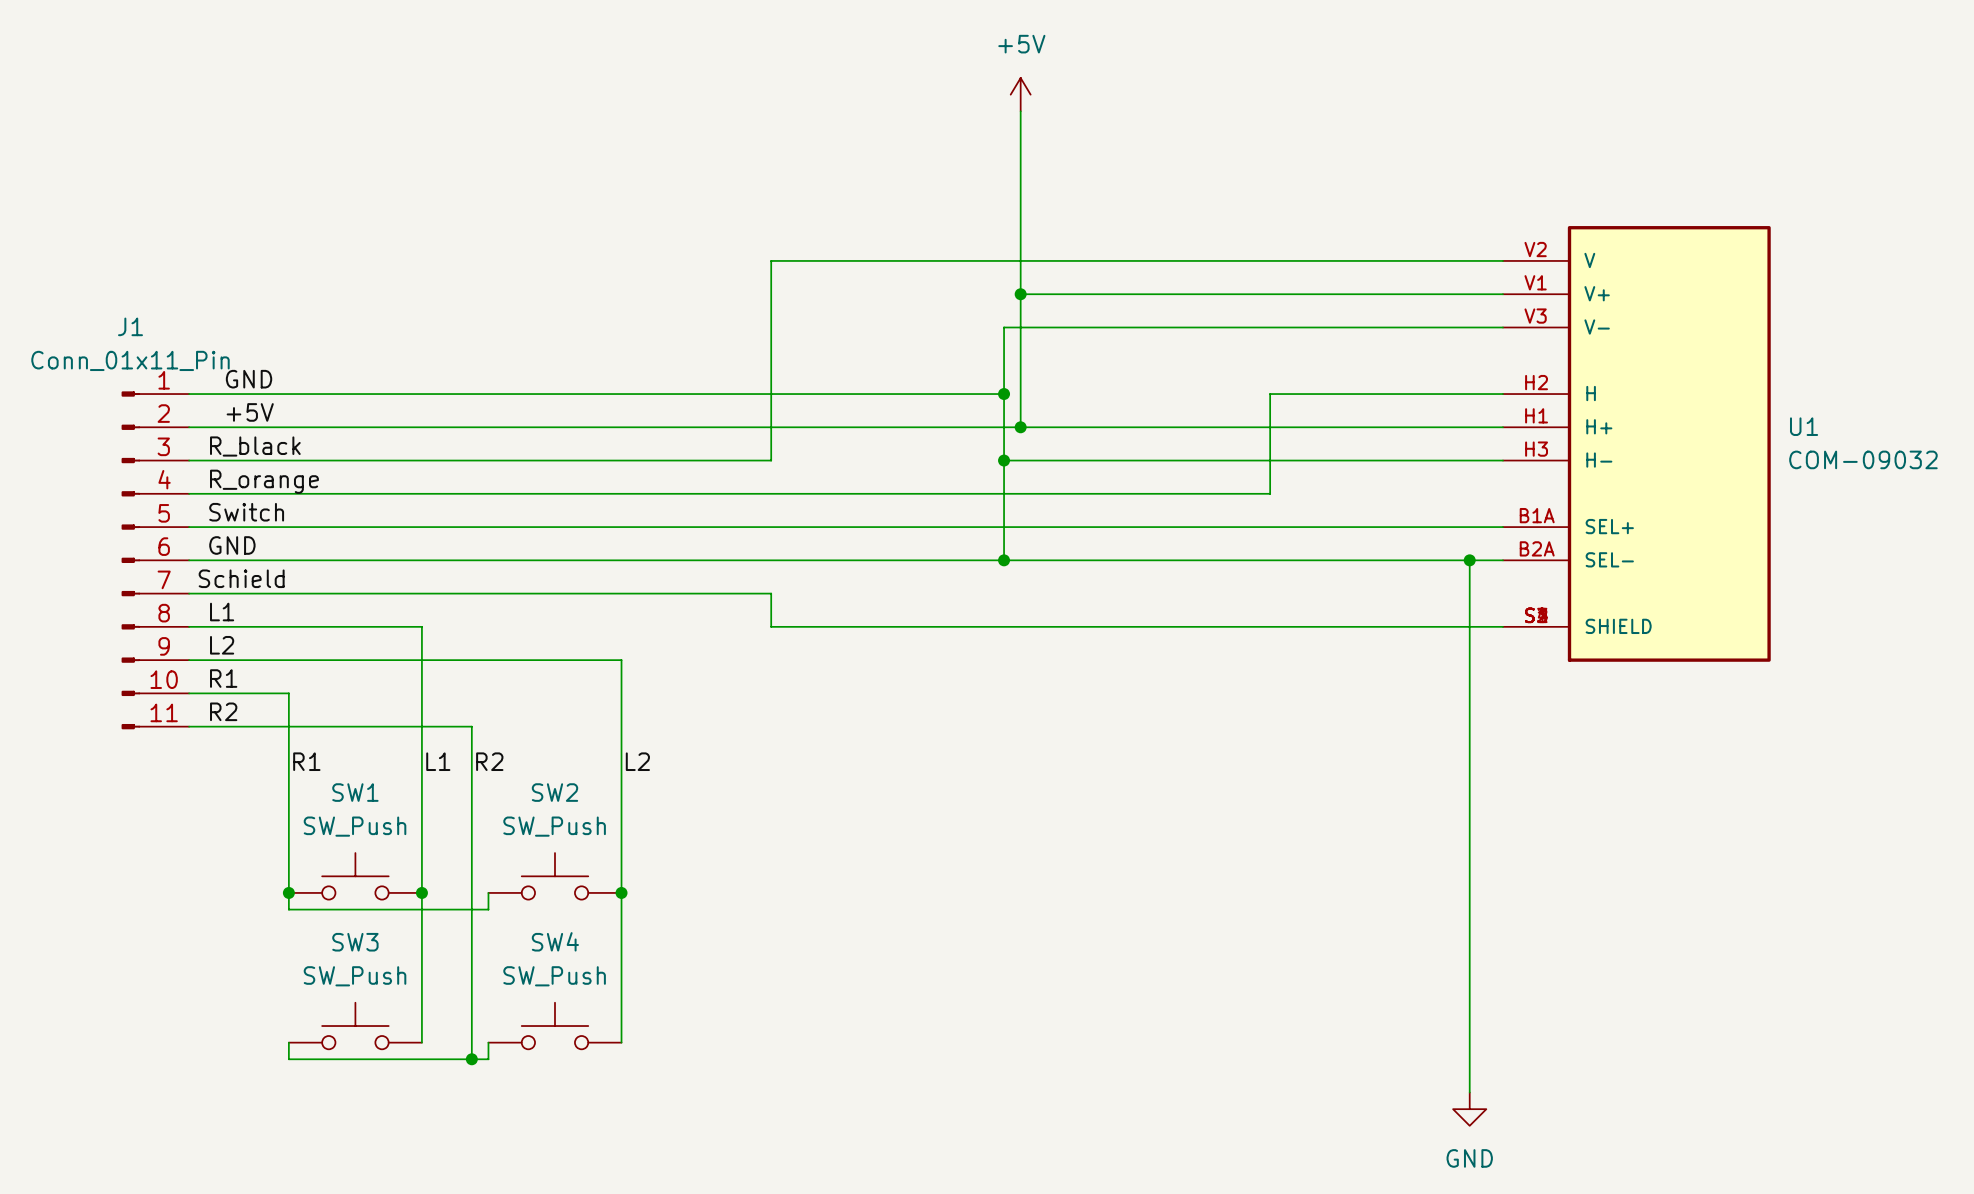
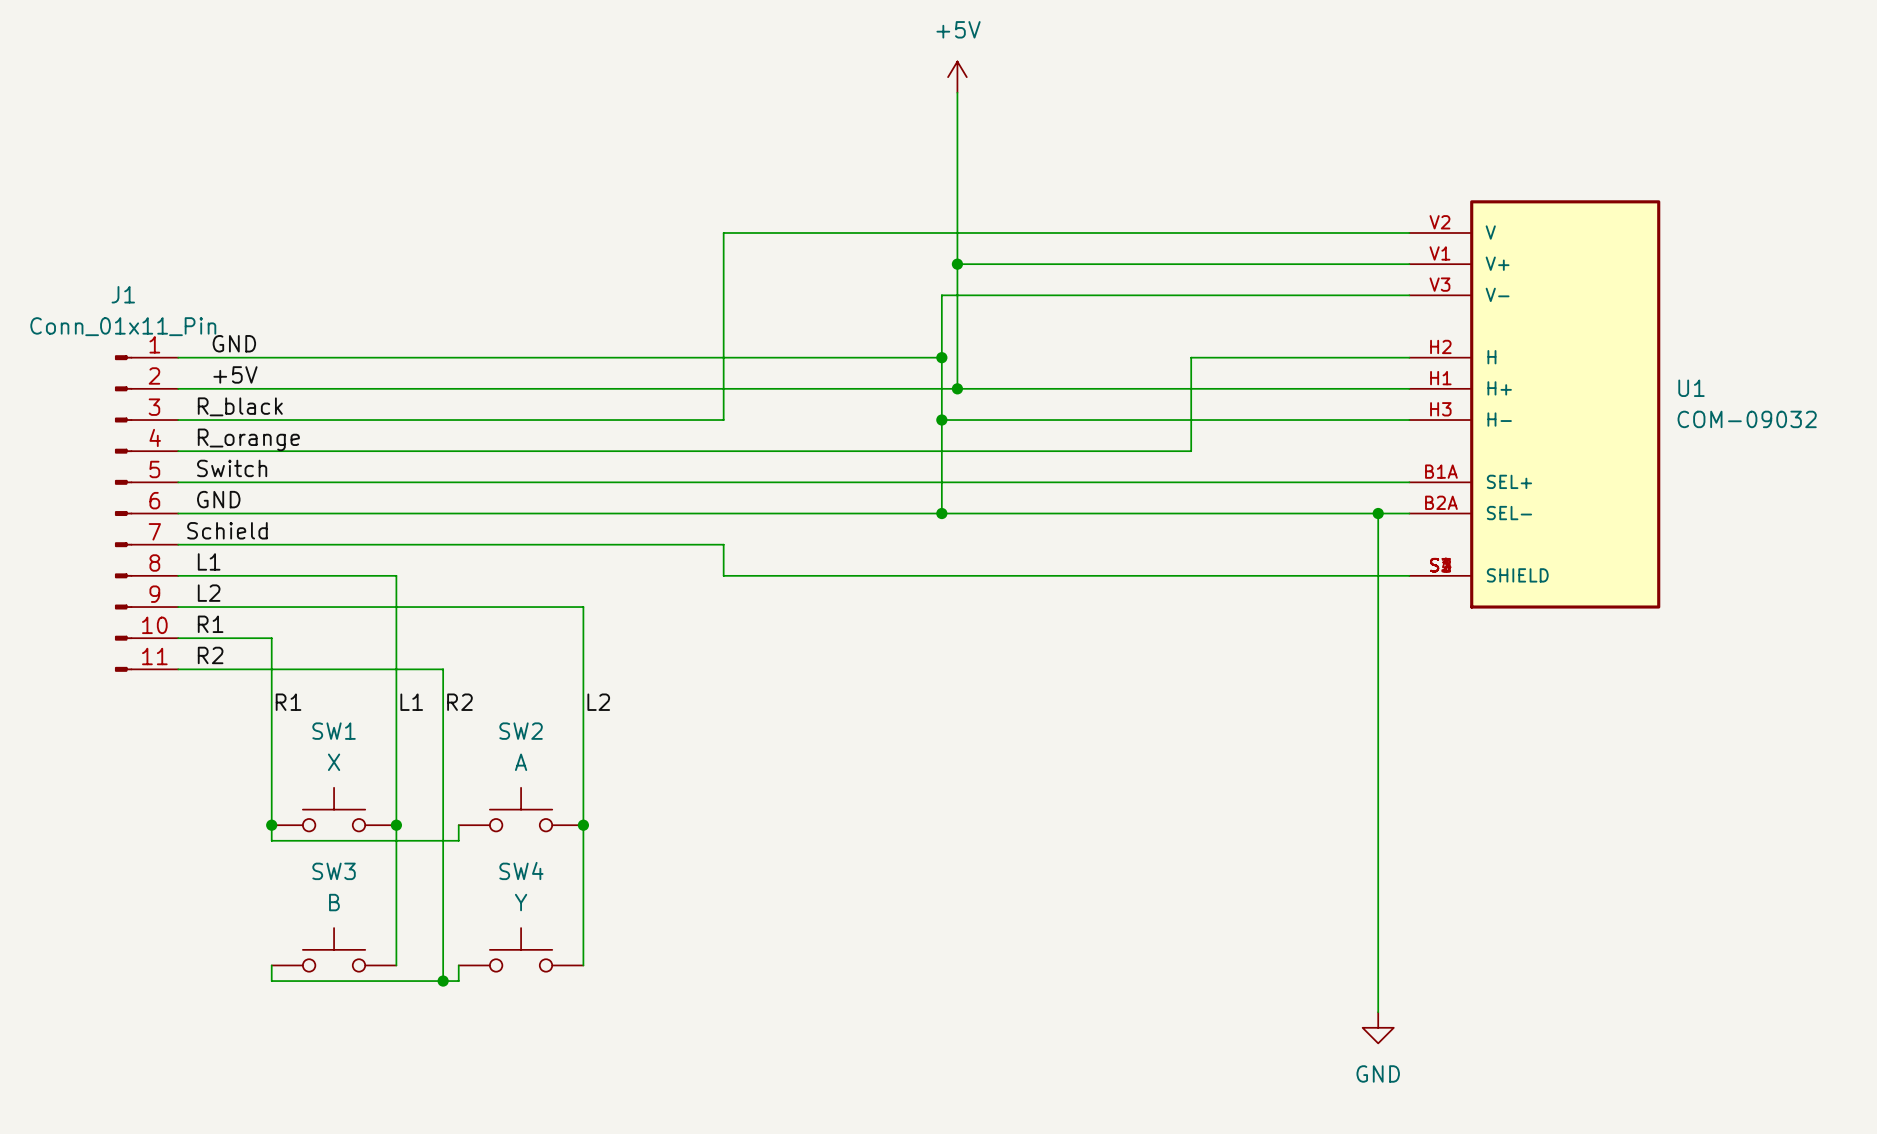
SW1 value: SW_Push (355, 826) -> X (334, 762)
SW2 value: SW_Push (554, 826) -> A (521, 762)
SW3 value: SW_Push (355, 976) -> B (334, 902)
SW4 value: SW_Push (554, 976) -> Y (521, 902)

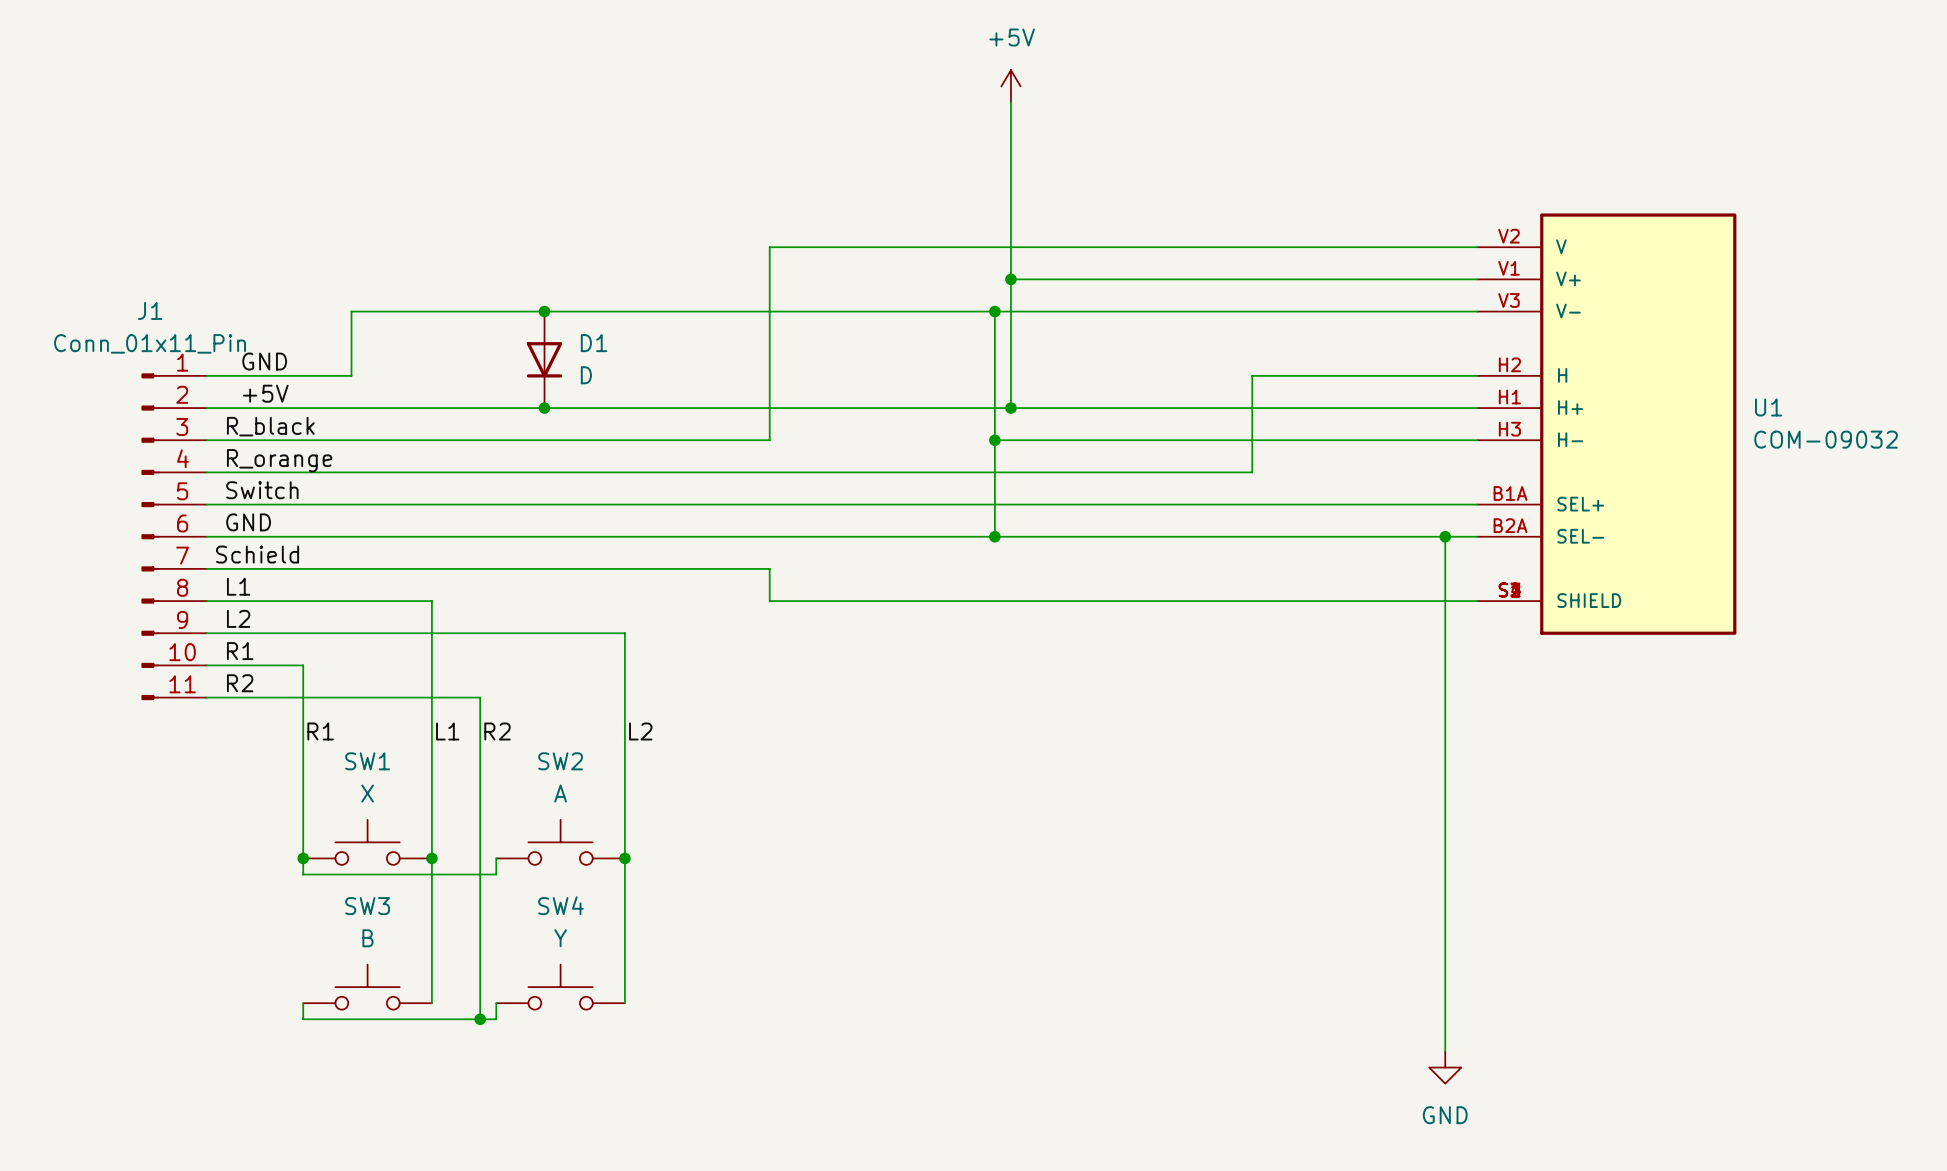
junction: none -> (544, 311)
D1: none -> D (544, 359)
wire: (318, 357) (941, 357) -> (351, 375) (351, 311) (994, 311)
junction position: (941, 357) -> (994, 311)
junction: none -> (544, 408)

